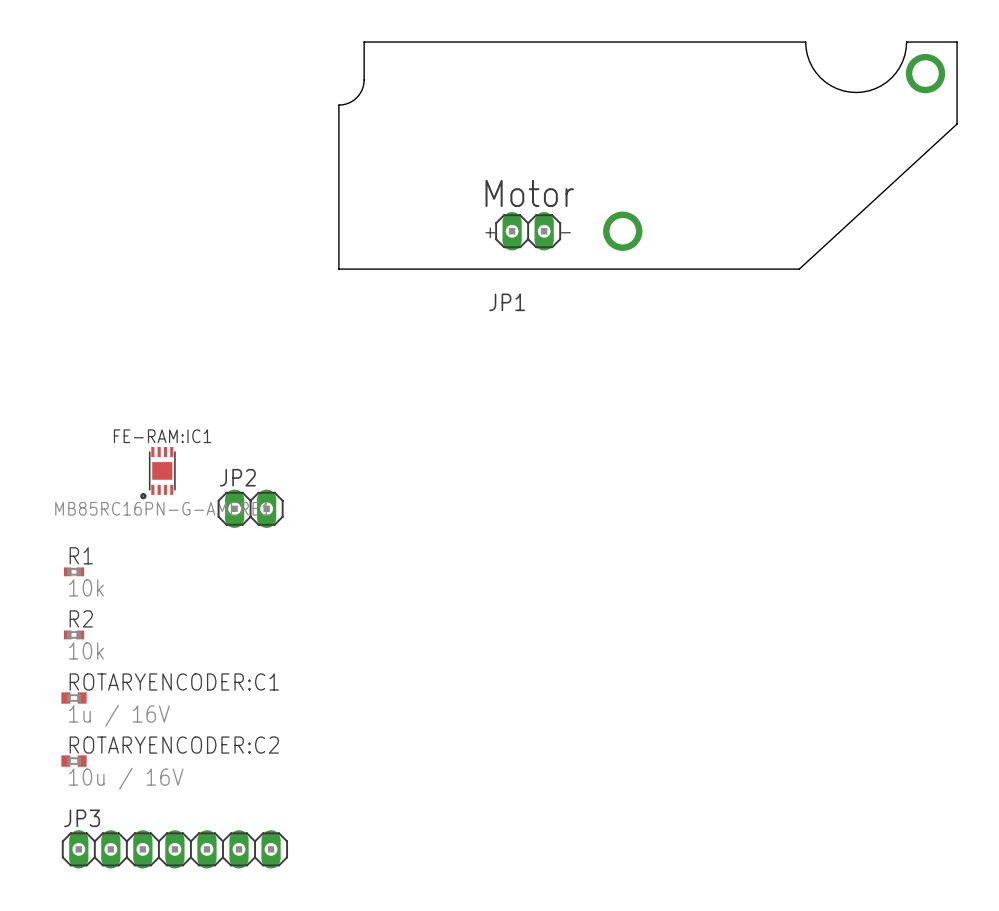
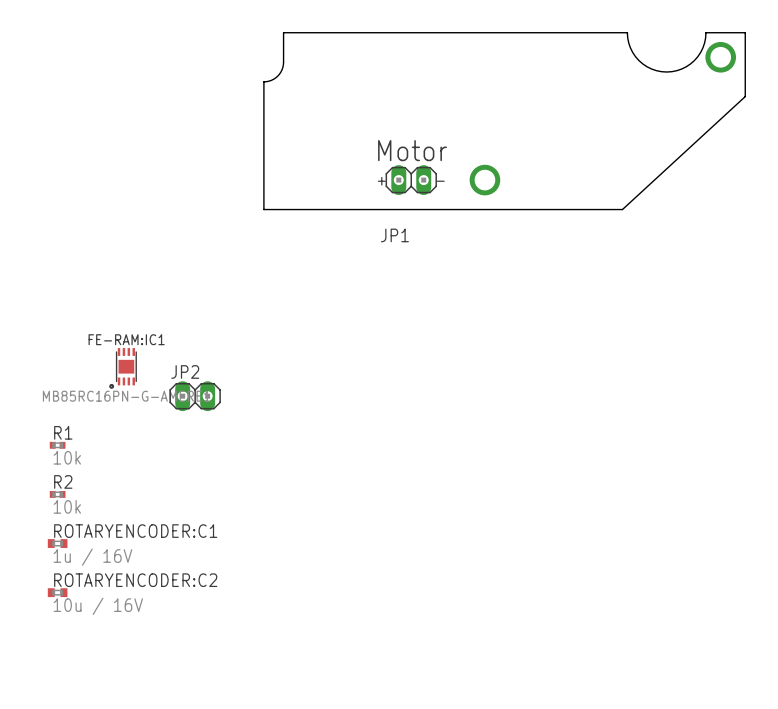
JP3: (174, 849) -> none

